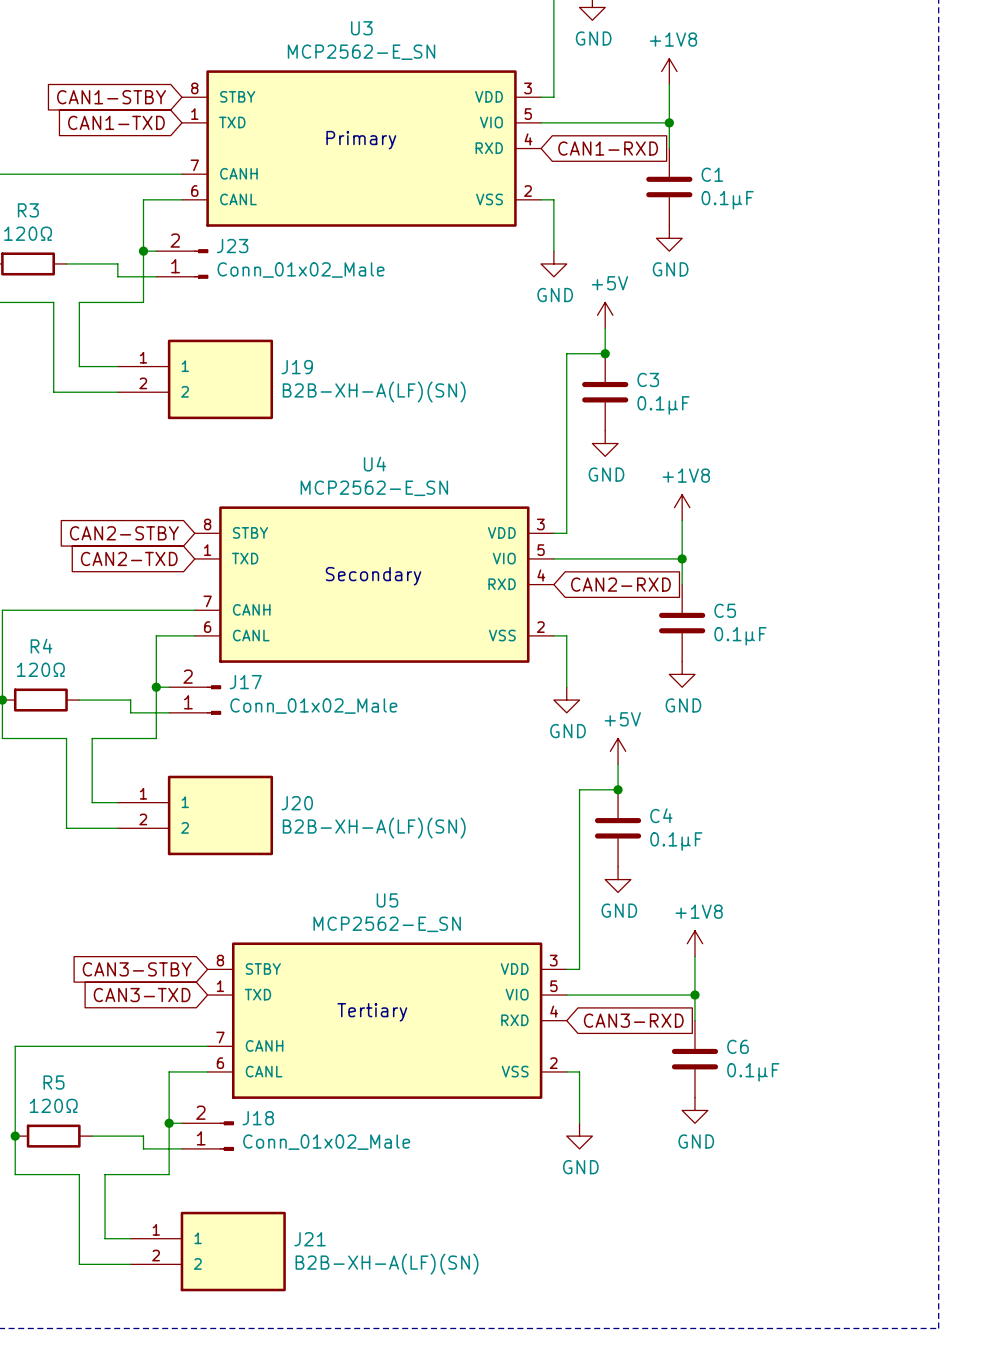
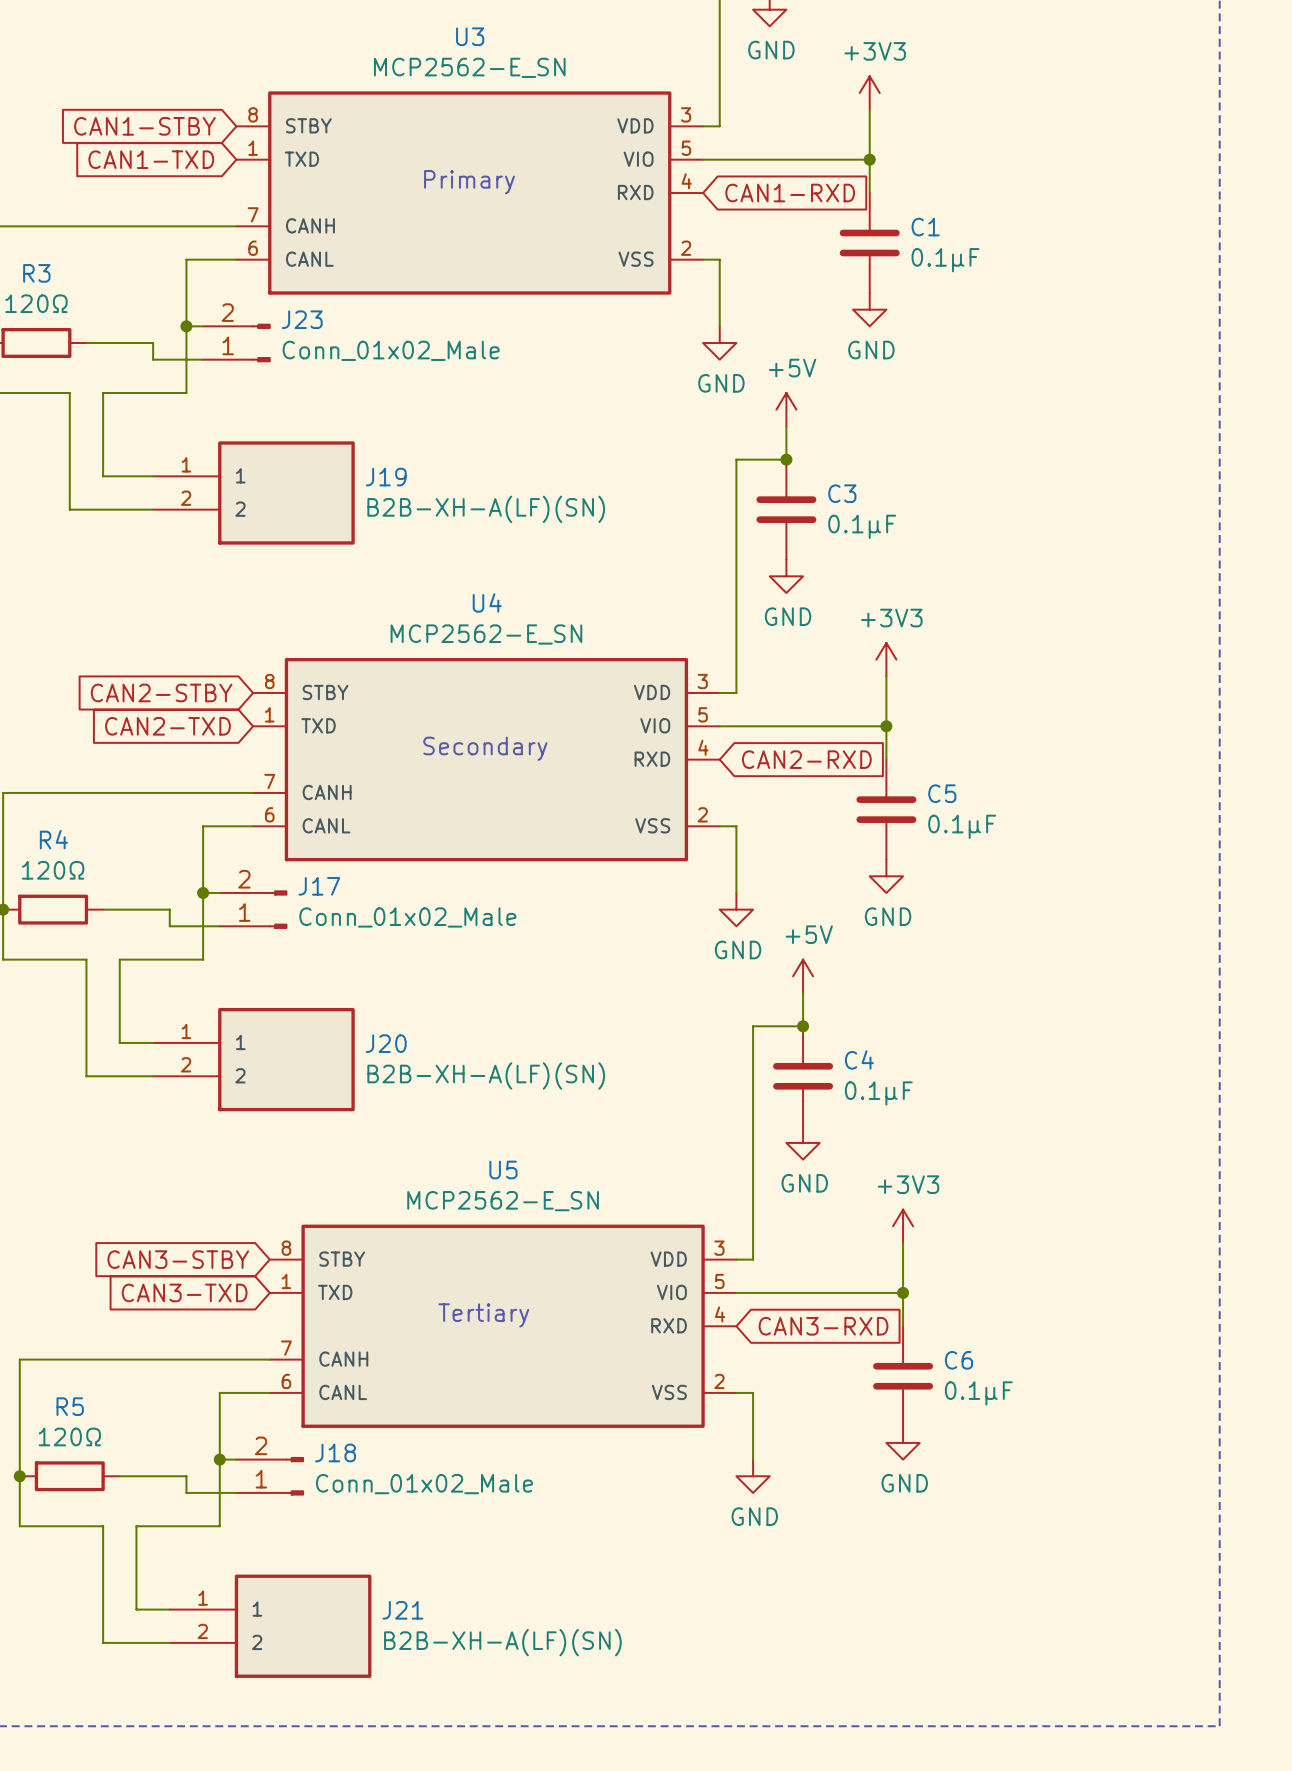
power symbol: +1V8 (669, 71) -> +3V3 (869, 93)
power symbol: +1V8 (682, 507) -> +3V3 (886, 659)
power symbol: +1V8 (694, 943) -> +3V3 (903, 1226)

